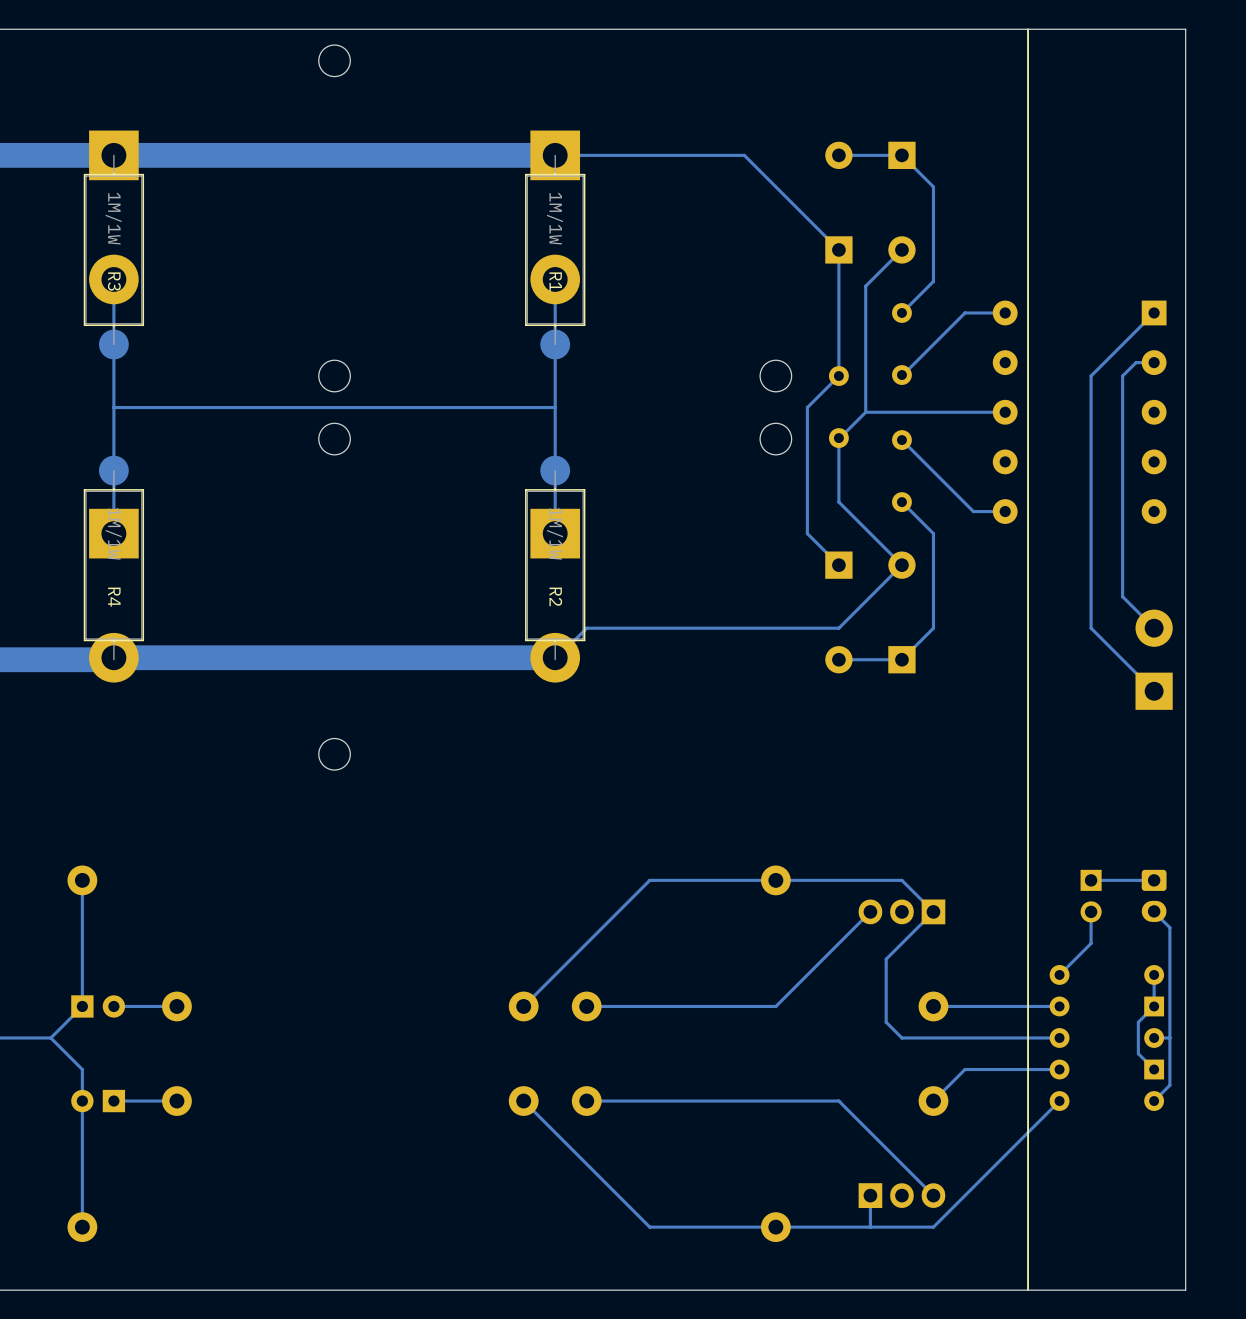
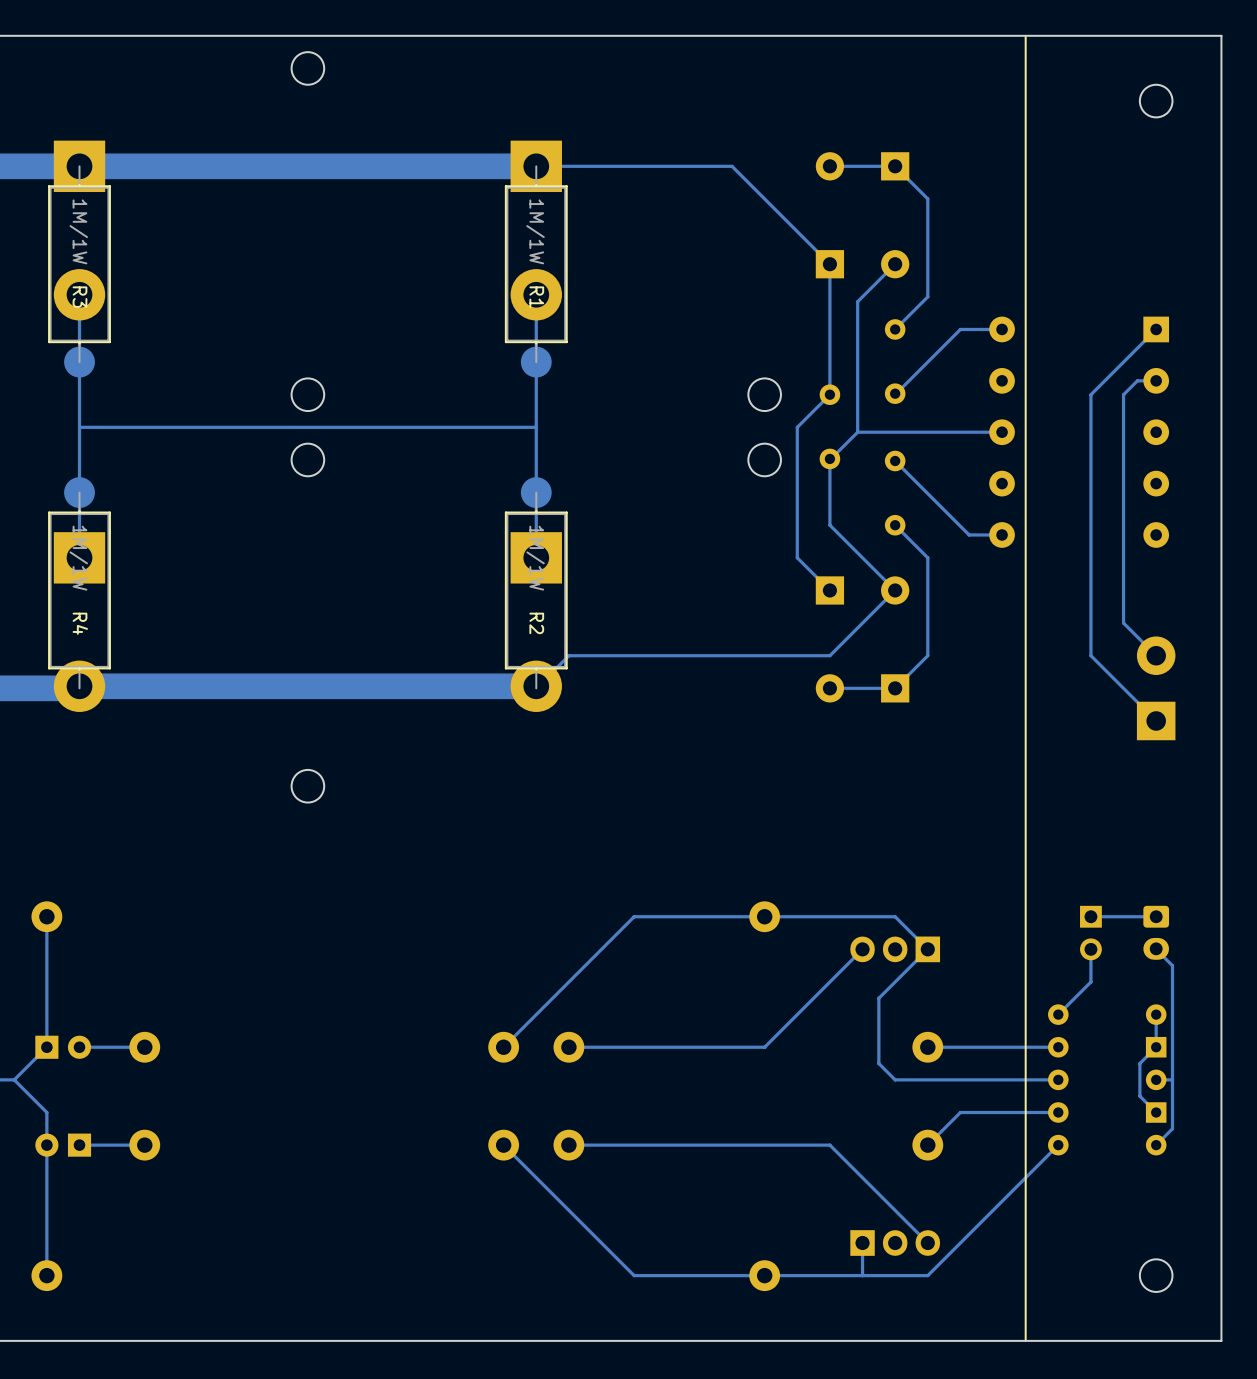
board edge: (1185, 29) (1185, 1290) -> (1188, 35) (1221, 35) (1221, 1340) (1188, 1340)
round board edge: none -> [1139, 84, 1173, 118]
round board edge: none -> [1139, 1259, 1173, 1293]

